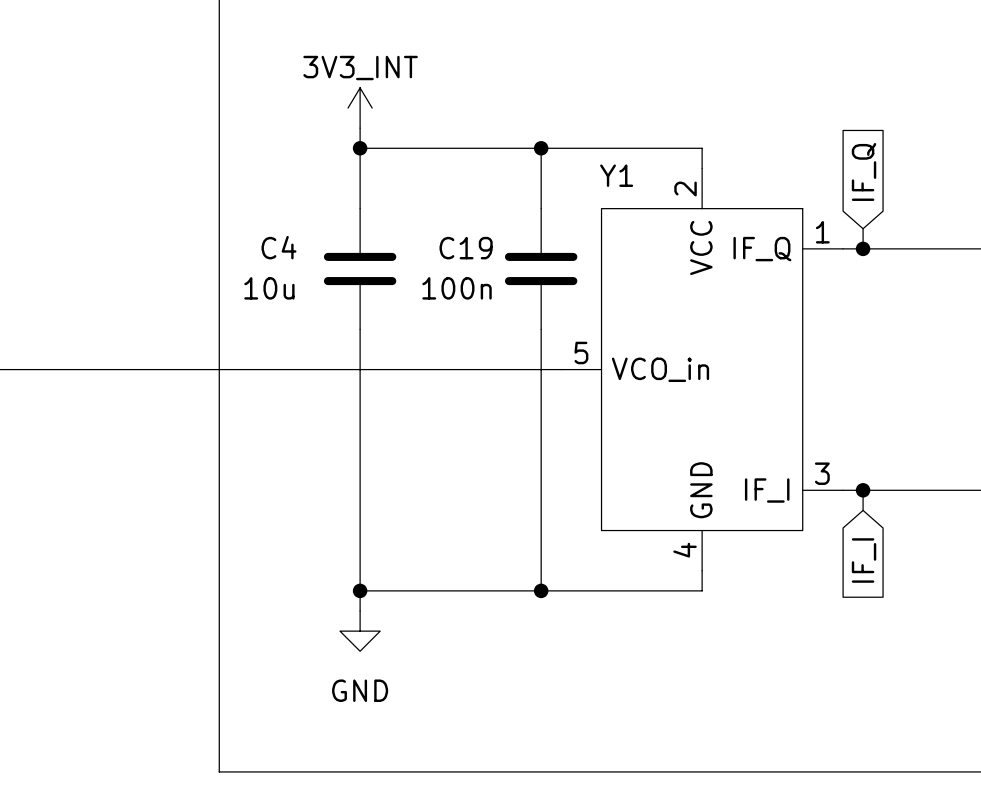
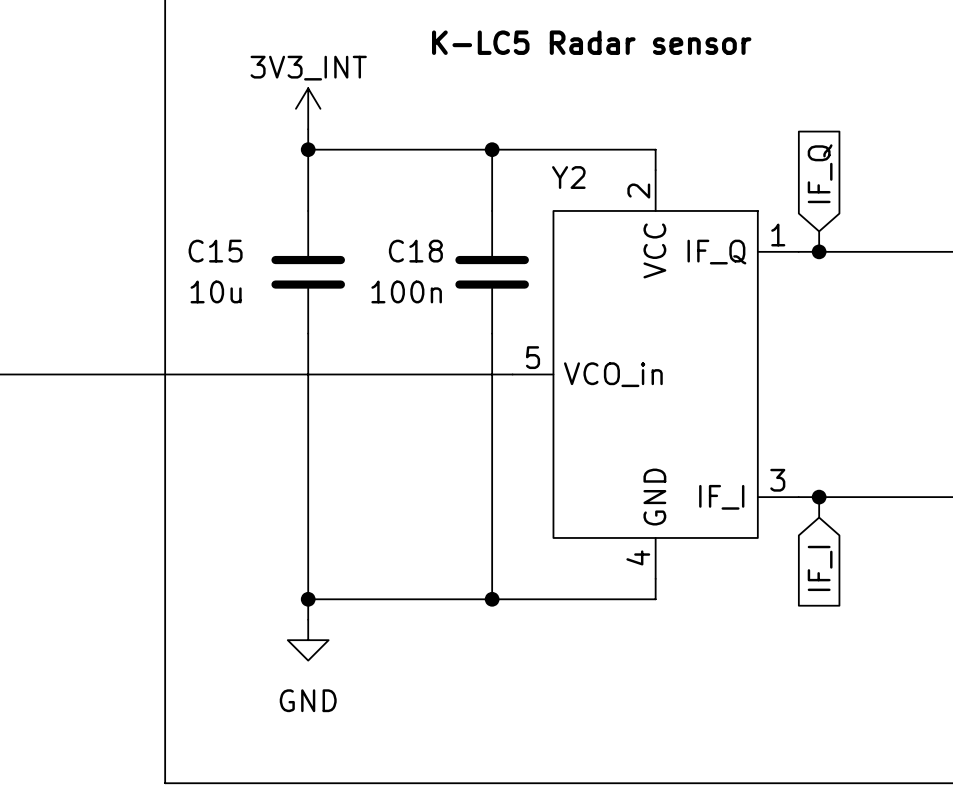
text: none -> K-LC5 Radar sensor (591, 42)
Y1 name: Y1 (616, 175) -> Y2 (568, 177)
C4 name: C4 (279, 247) -> C15 (215, 251)
C19 name: C19 (466, 248) -> C18 (415, 251)

